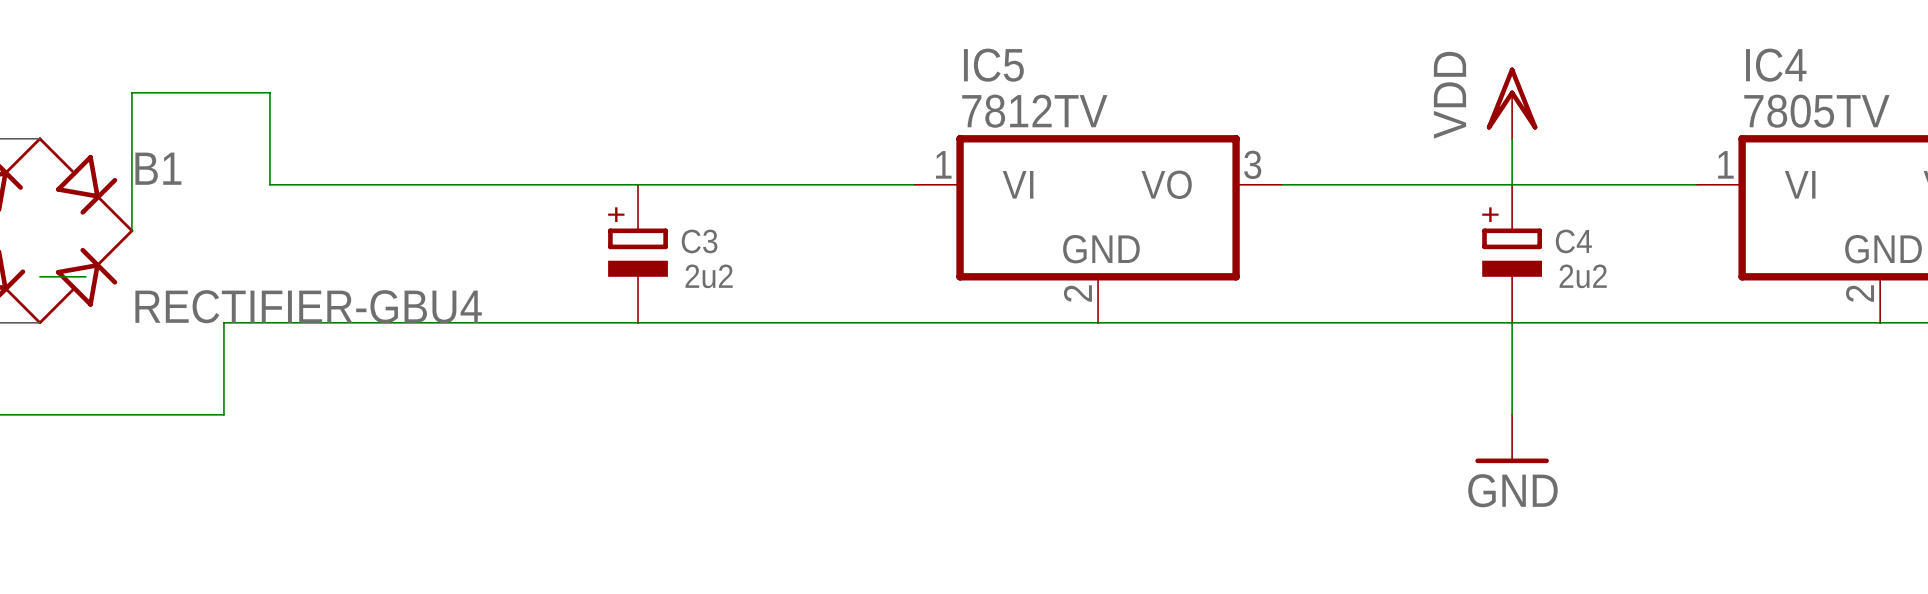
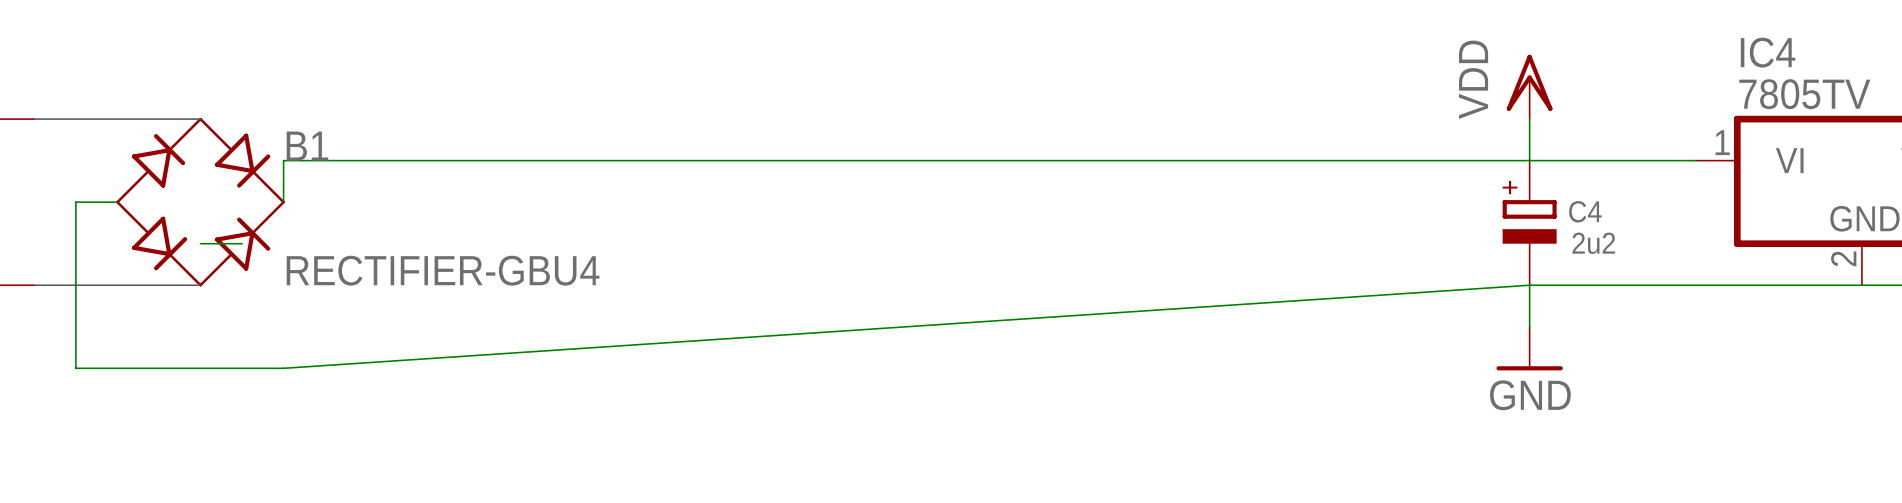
wire: (131, 184) (131, 92) (269, 92) (269, 184) -> (283, 160) (408, 160)
wire: none -> (989, 160) (1321, 160)
IC5: 7812TV (1098, 228) -> none
C3: 2u2 (638, 253) -> none
wire: (1512, 322) (223, 322) (223, 414) (131, 414) -> (1529, 285) (283, 368)
power symbol position: GND (1512, 438) -> GND (1529, 348)

